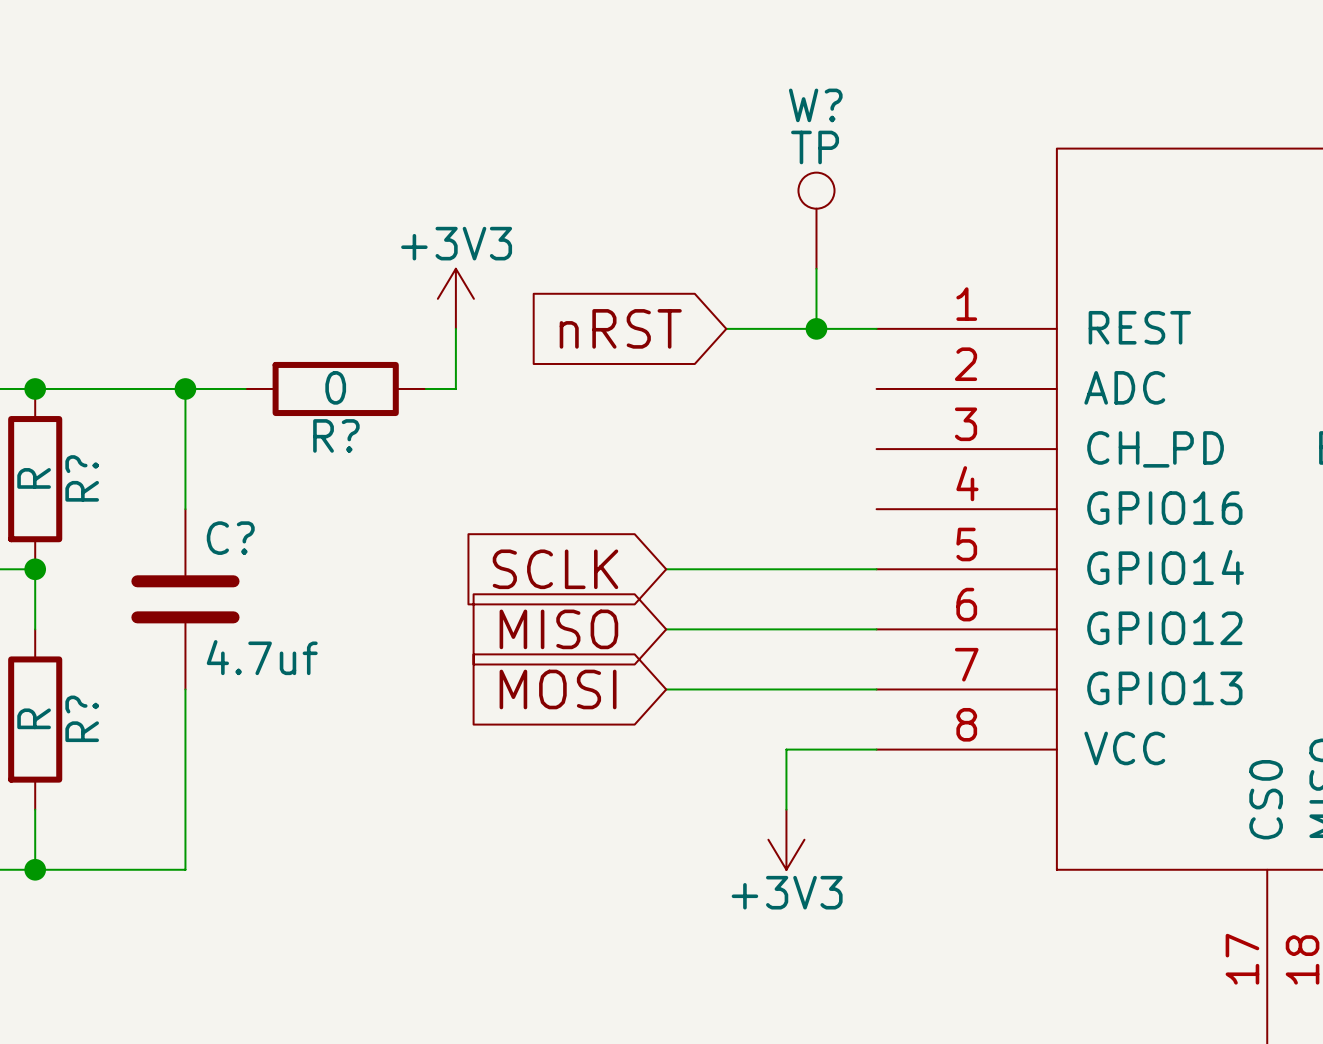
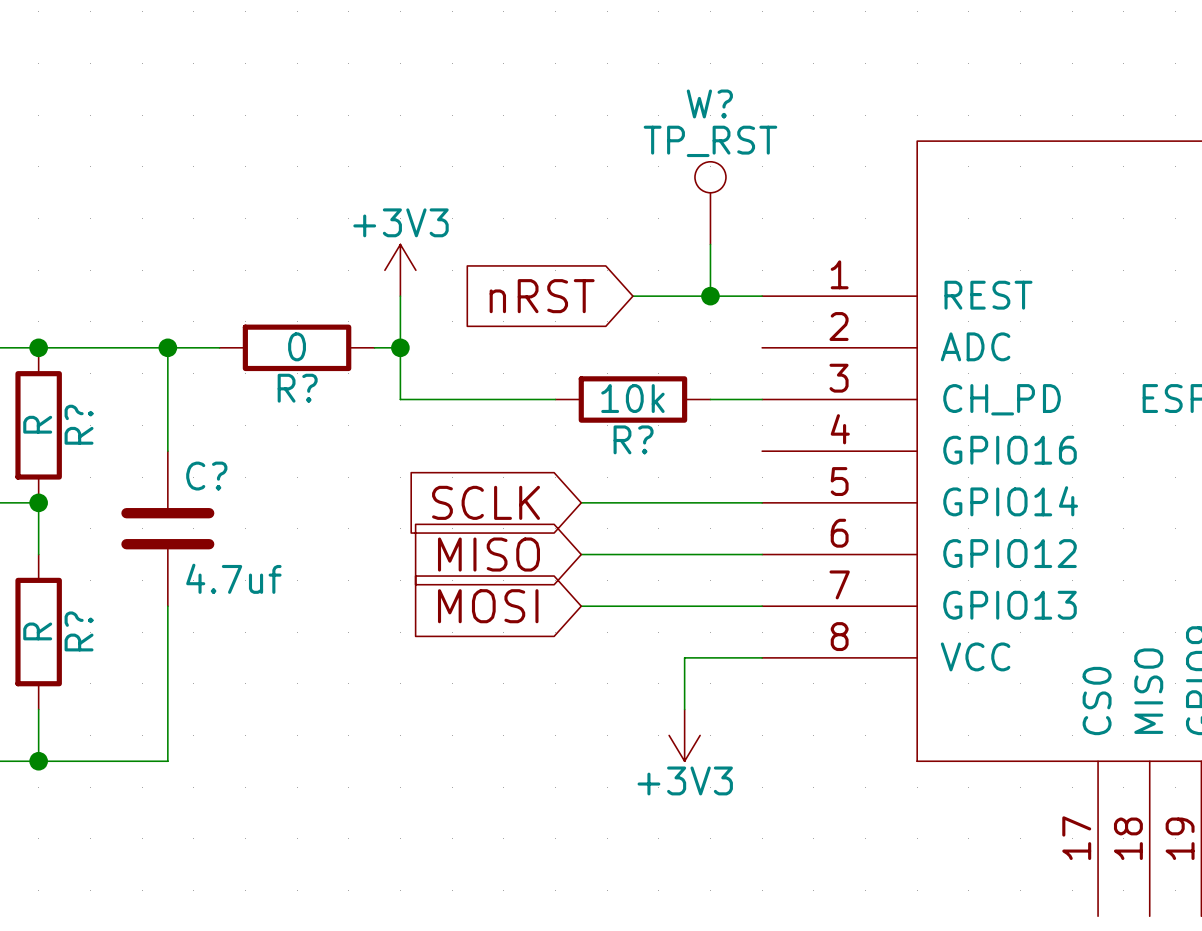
W? value: TP (815, 147) -> TP_RST (710, 141)
wire: none -> (400, 347) (400, 399) (555, 399)
junction: none -> (400, 347)
R?: none -> 10k (632, 399)
wire: none -> (710, 399) (762, 399)

